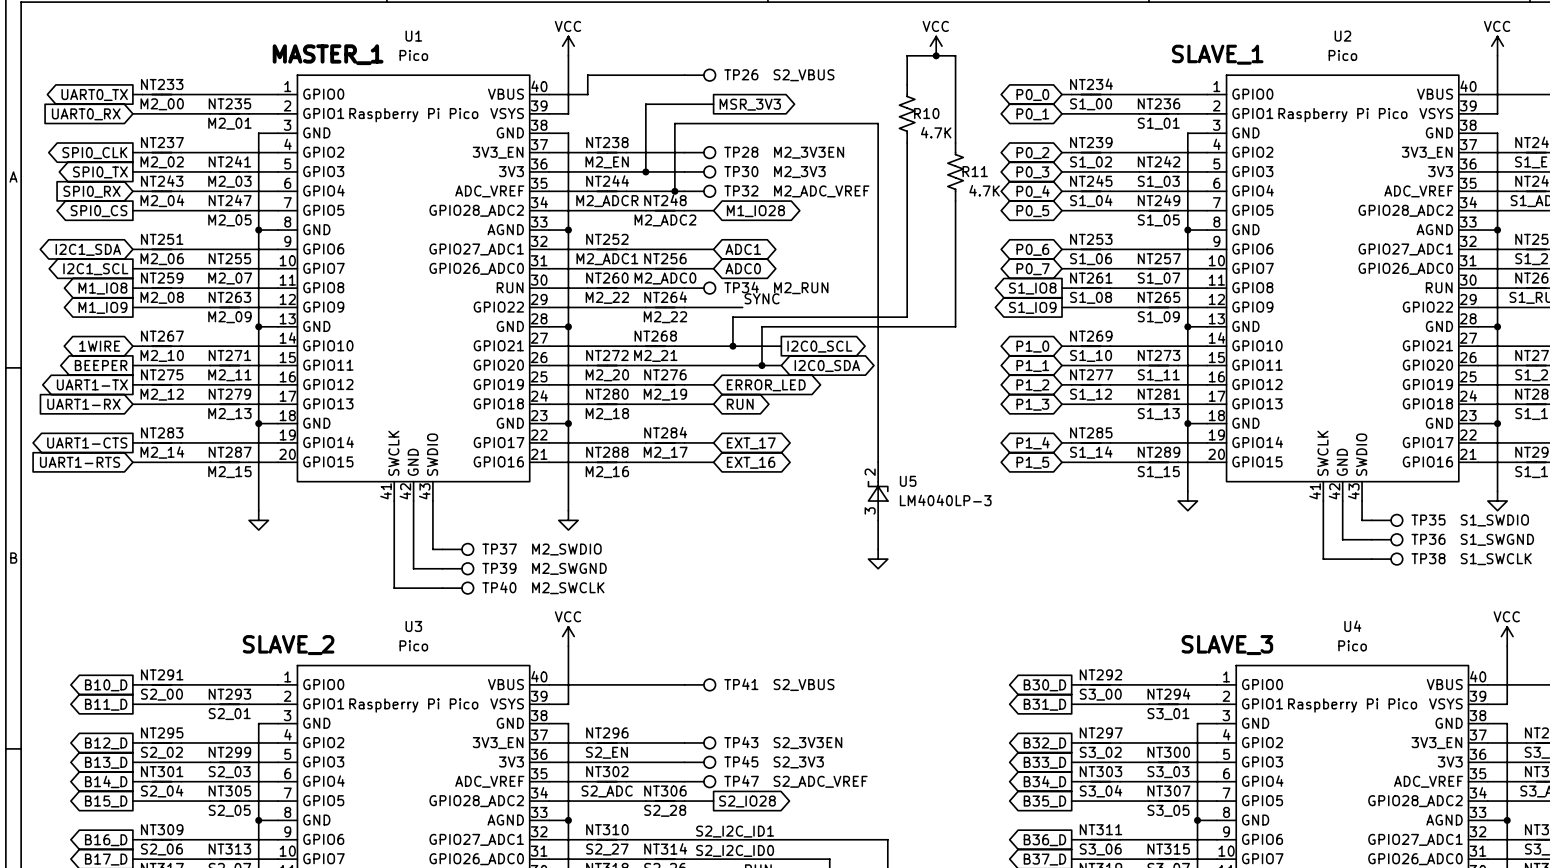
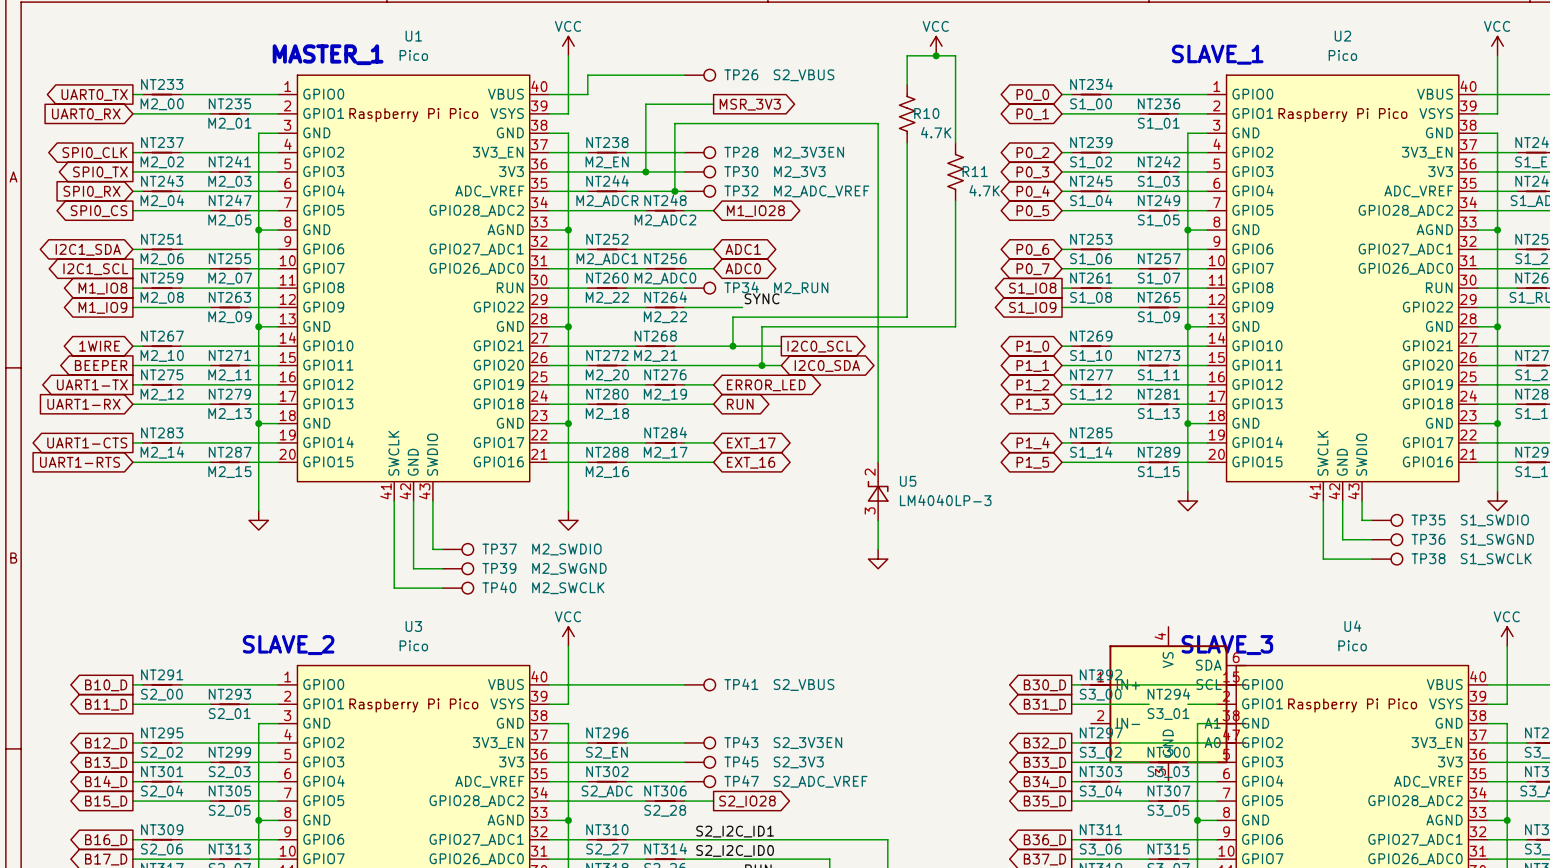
NT294 symbol: [1149, 703, 1188, 706] -> [1091, 626, 1246, 782]

